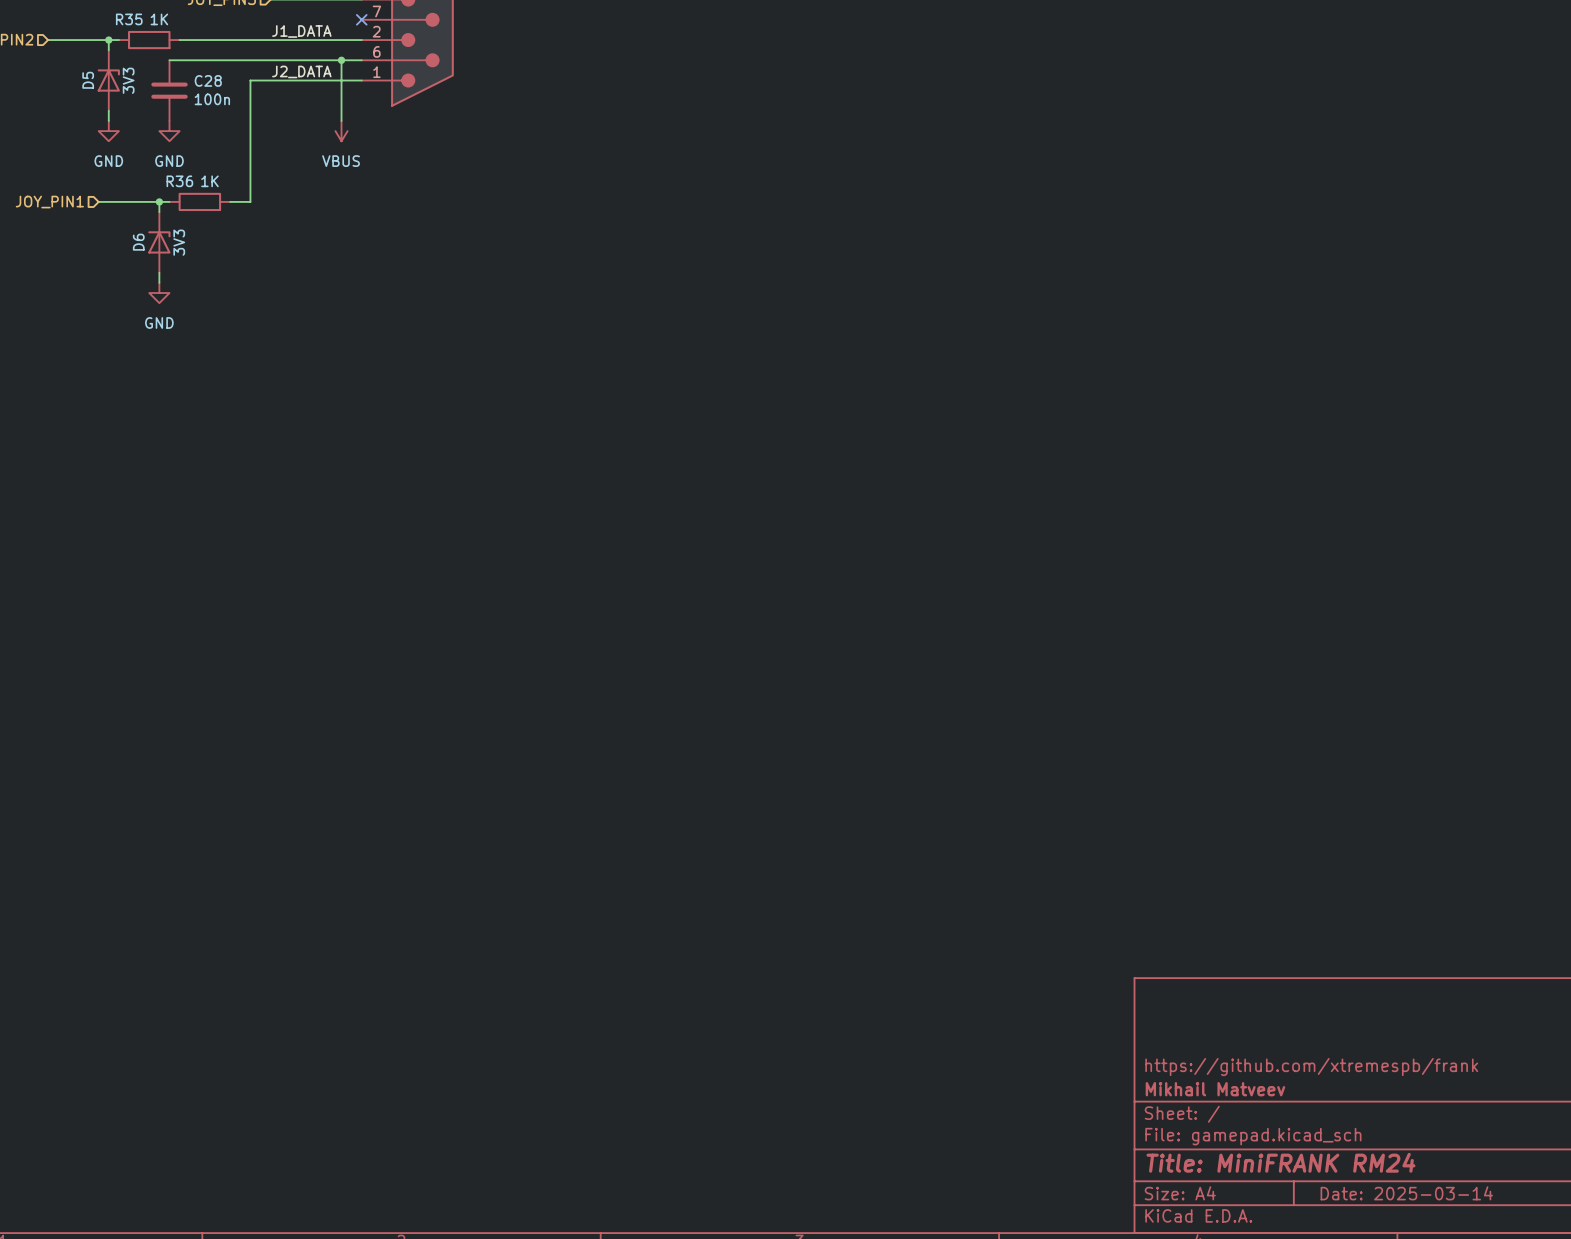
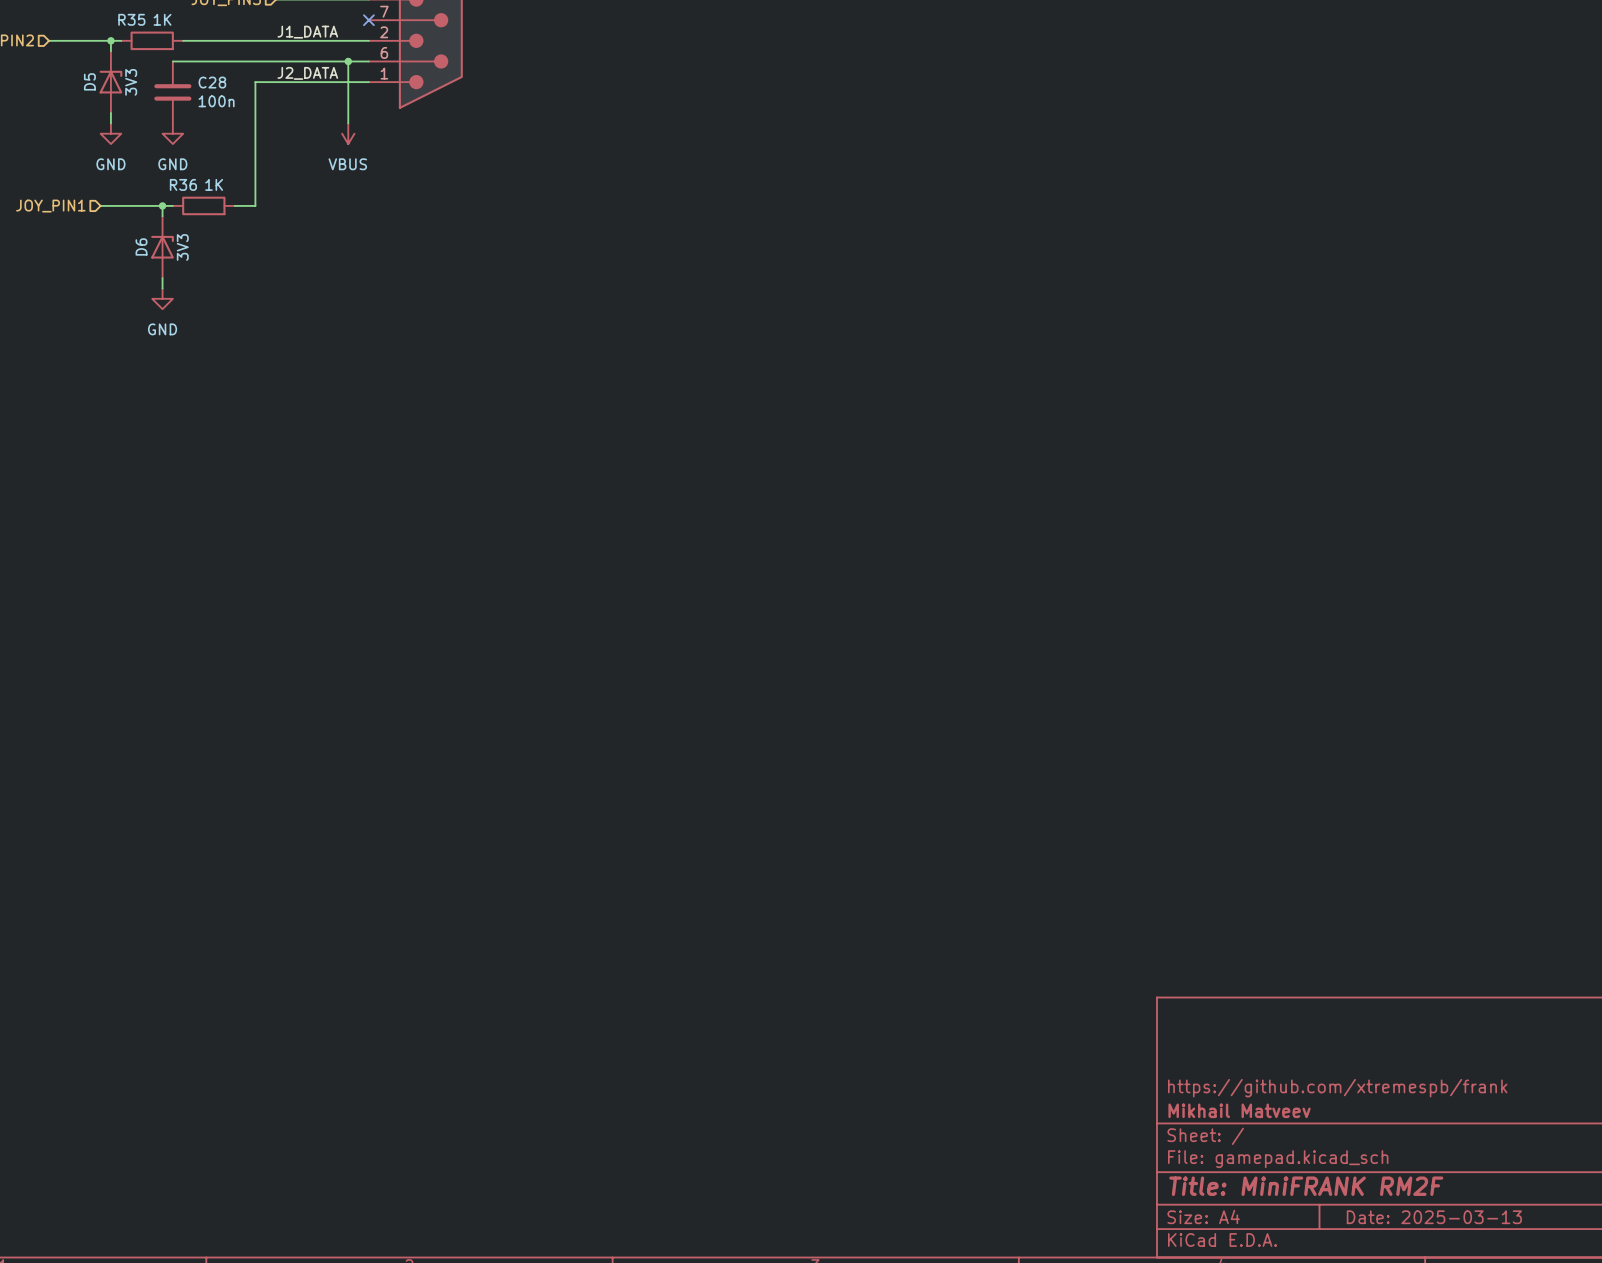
title block: Title: MiniFRANK RM24 (1280, 1162) -> Title: MiniFRANK RM2F (1306, 1186)
title block: Date: 2025-03-14 (1406, 1193) -> Date: 2025-03-13 (1434, 1217)

